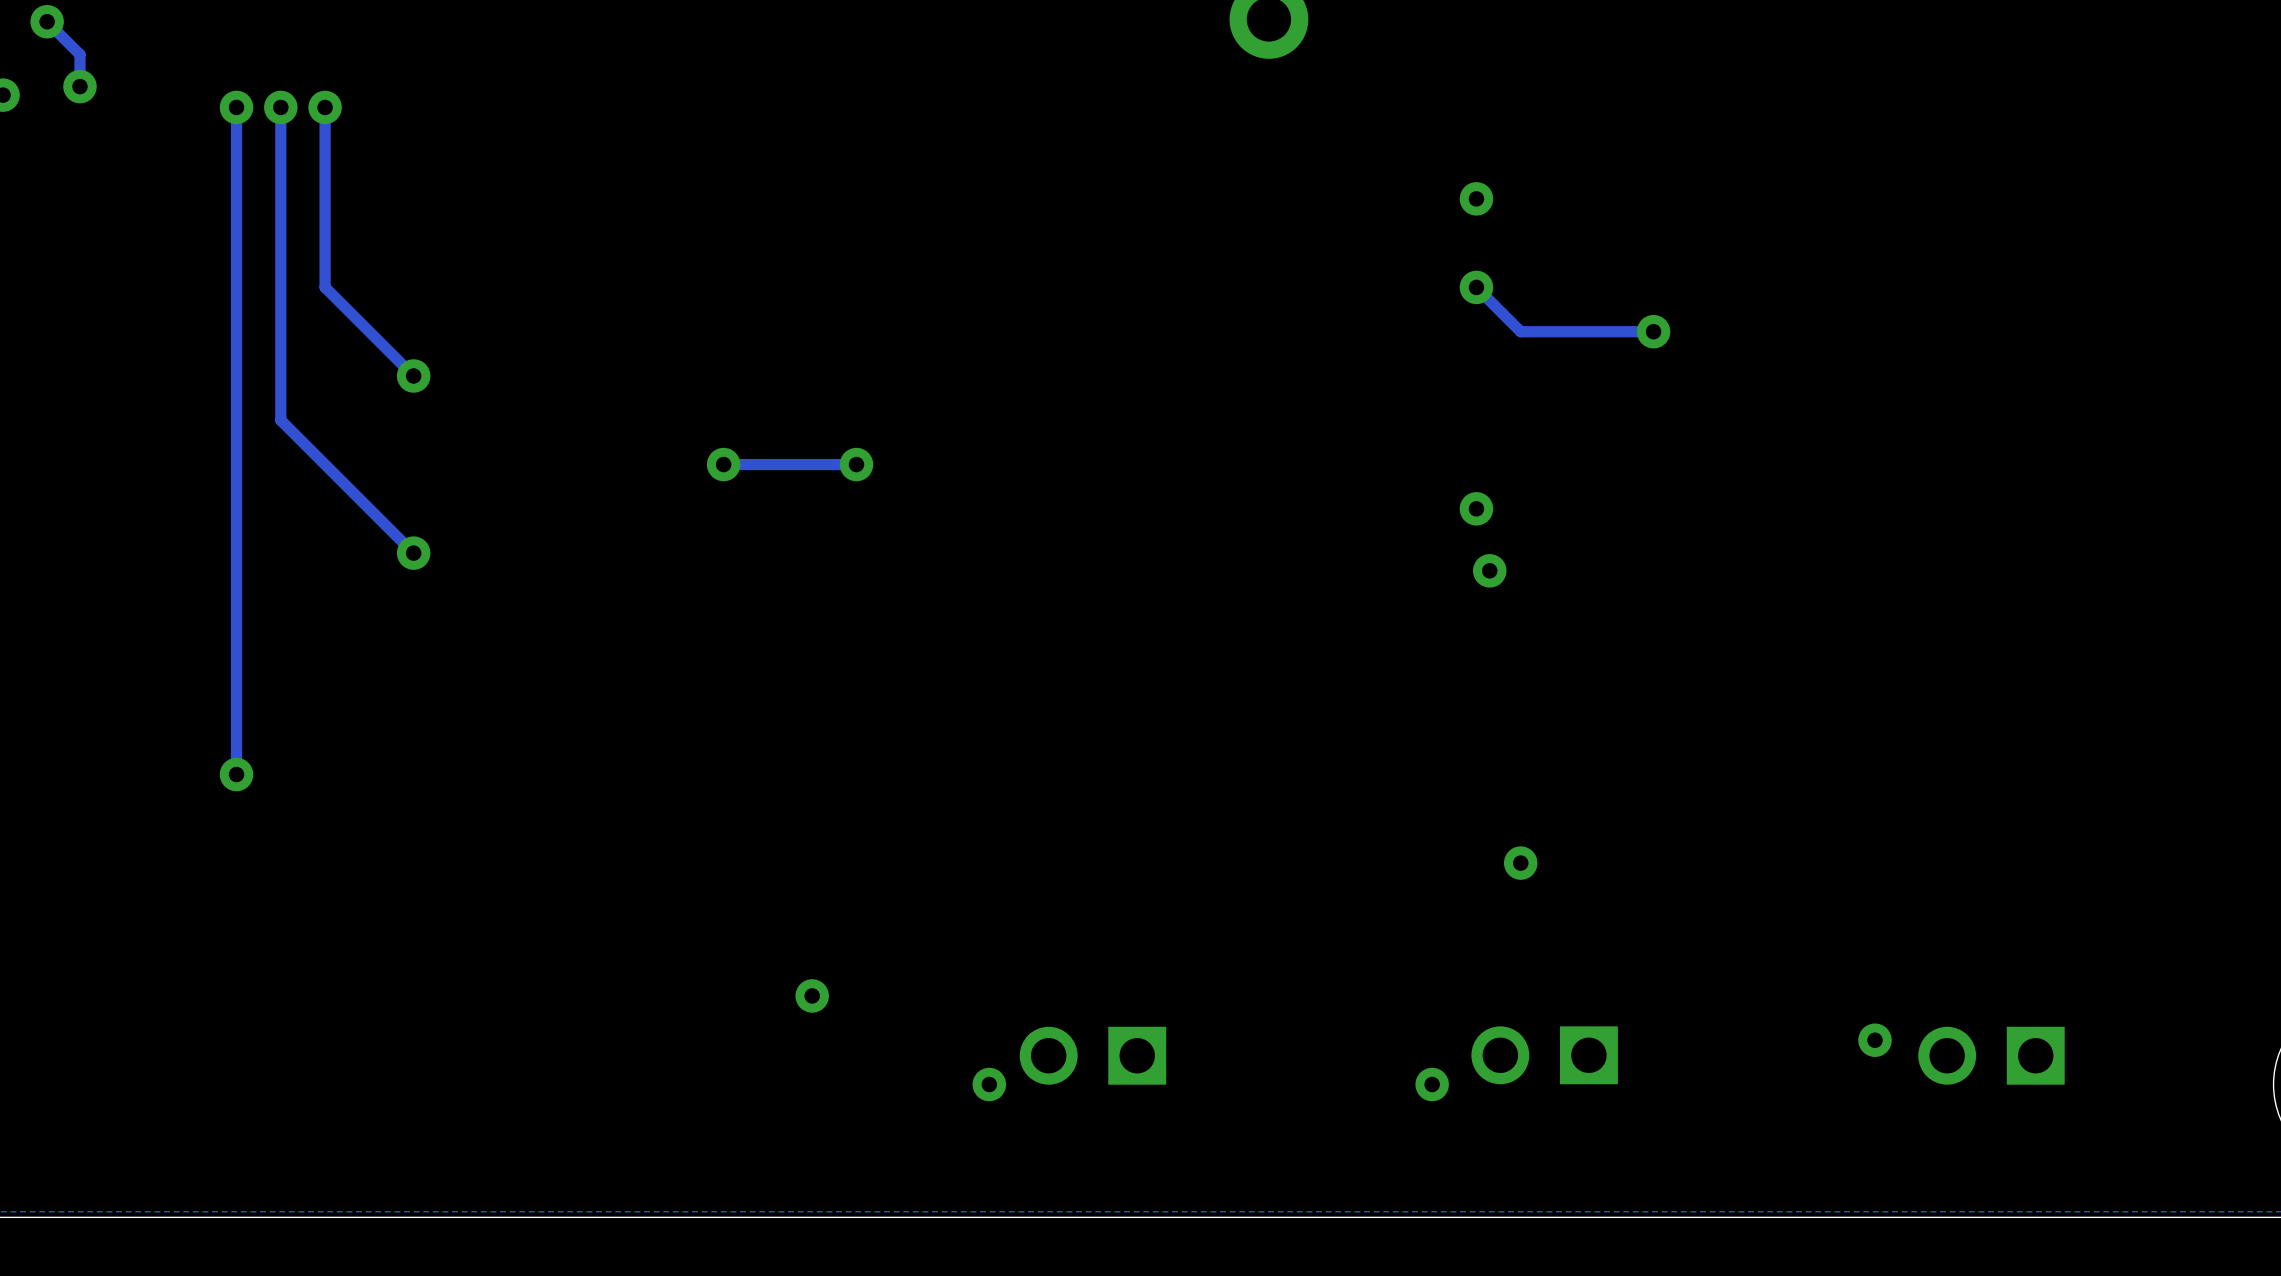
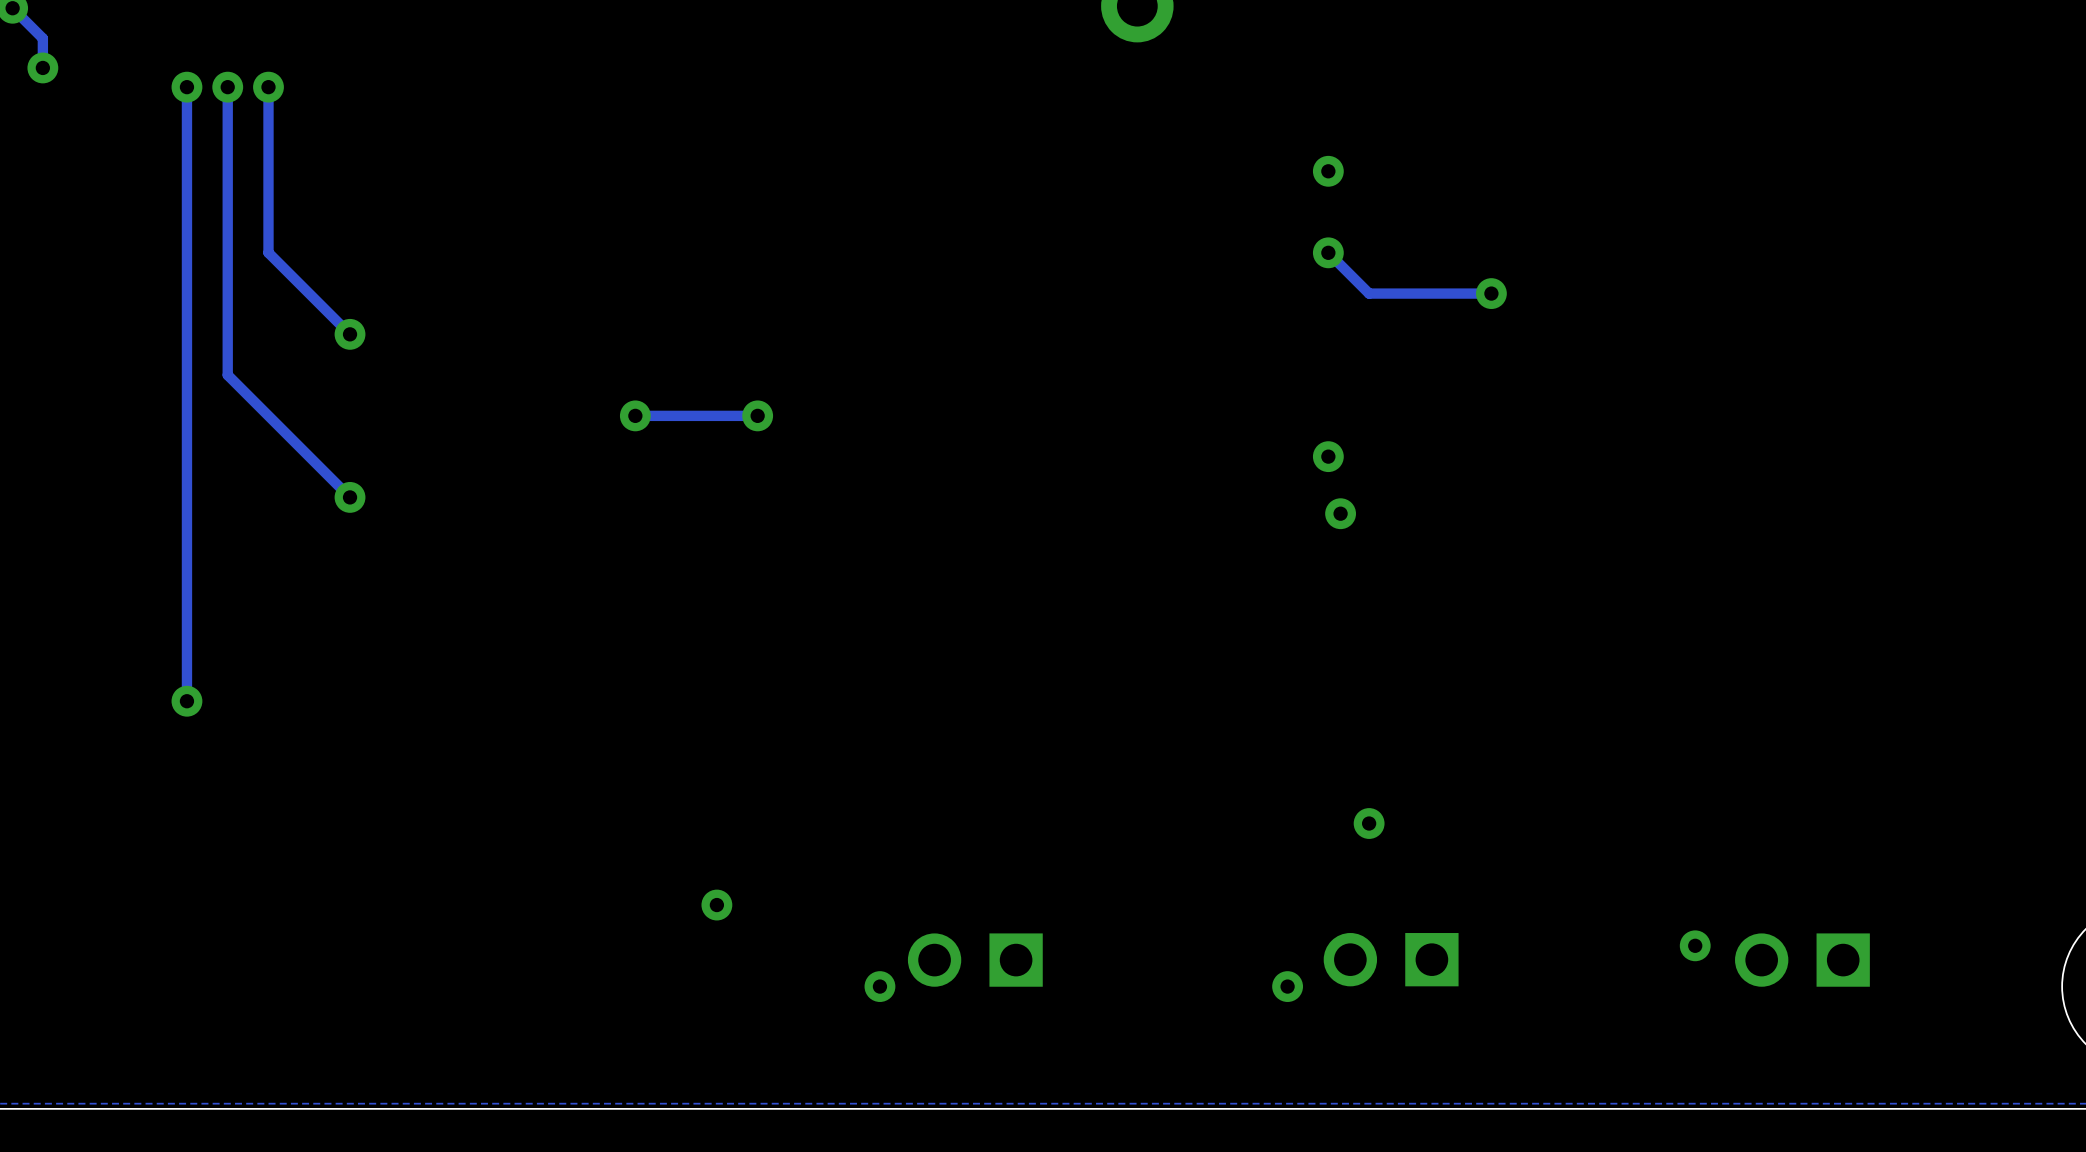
via position: (1520, 863) -> (1369, 823)

